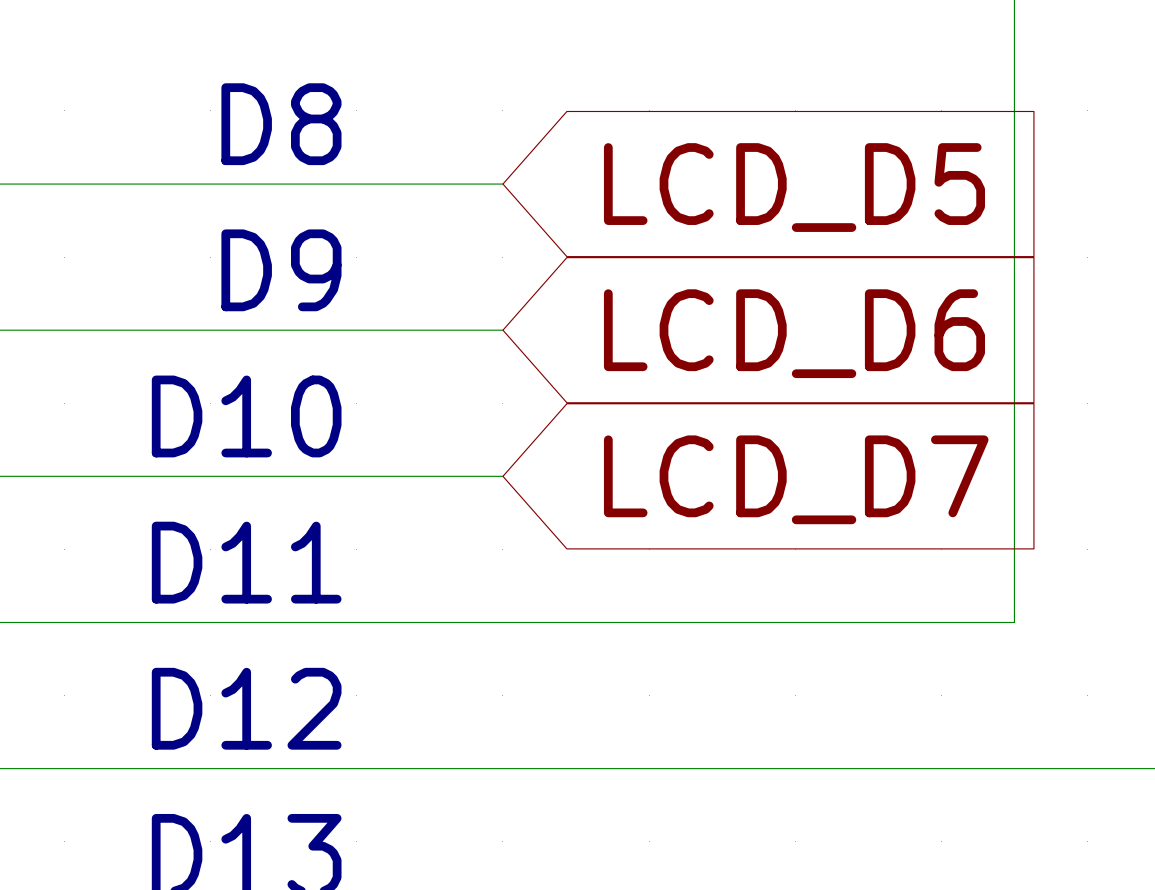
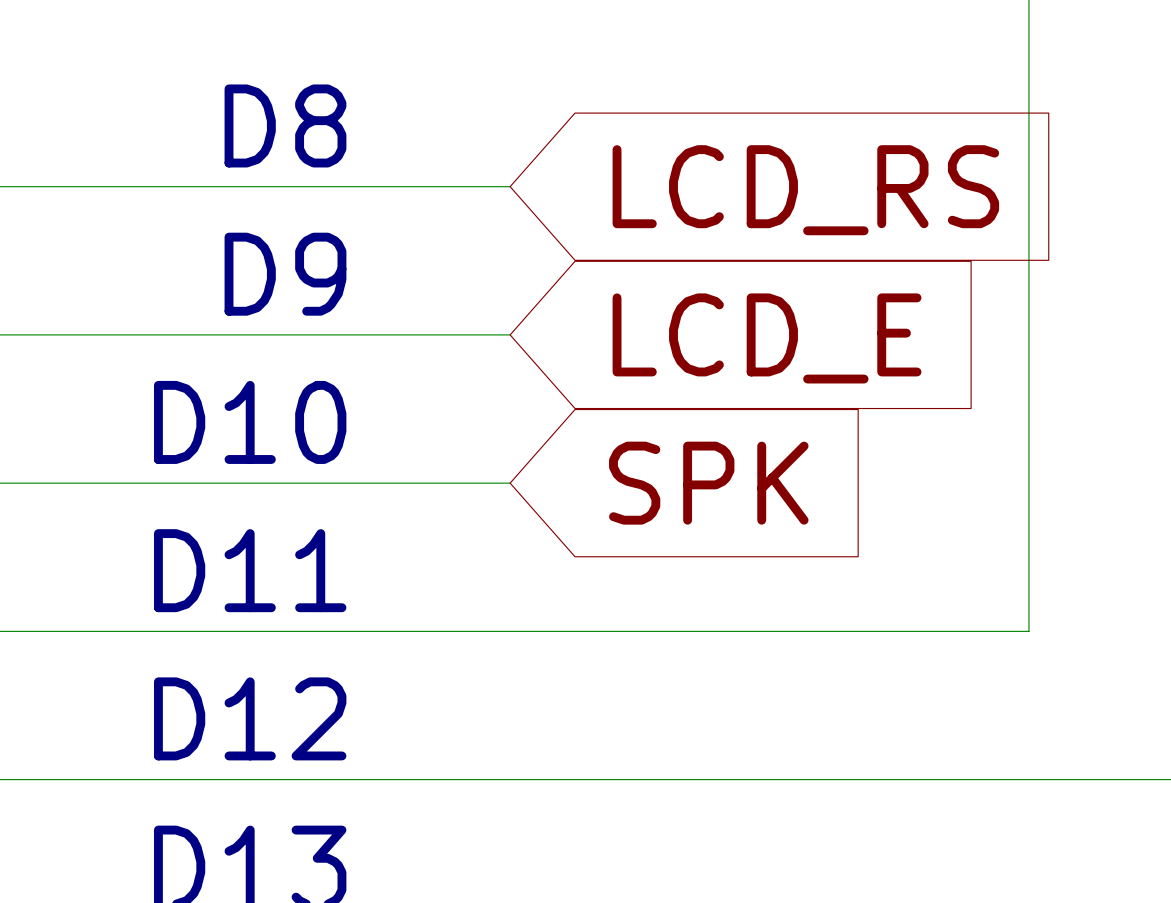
global label: LCD_D5 (794, 187) -> LCD_RS (805, 190)
global label: LCD_D6 (794, 333) -> LCD_E (767, 338)
global label: LCD_D7 (796, 479) -> SPK (708, 483)

